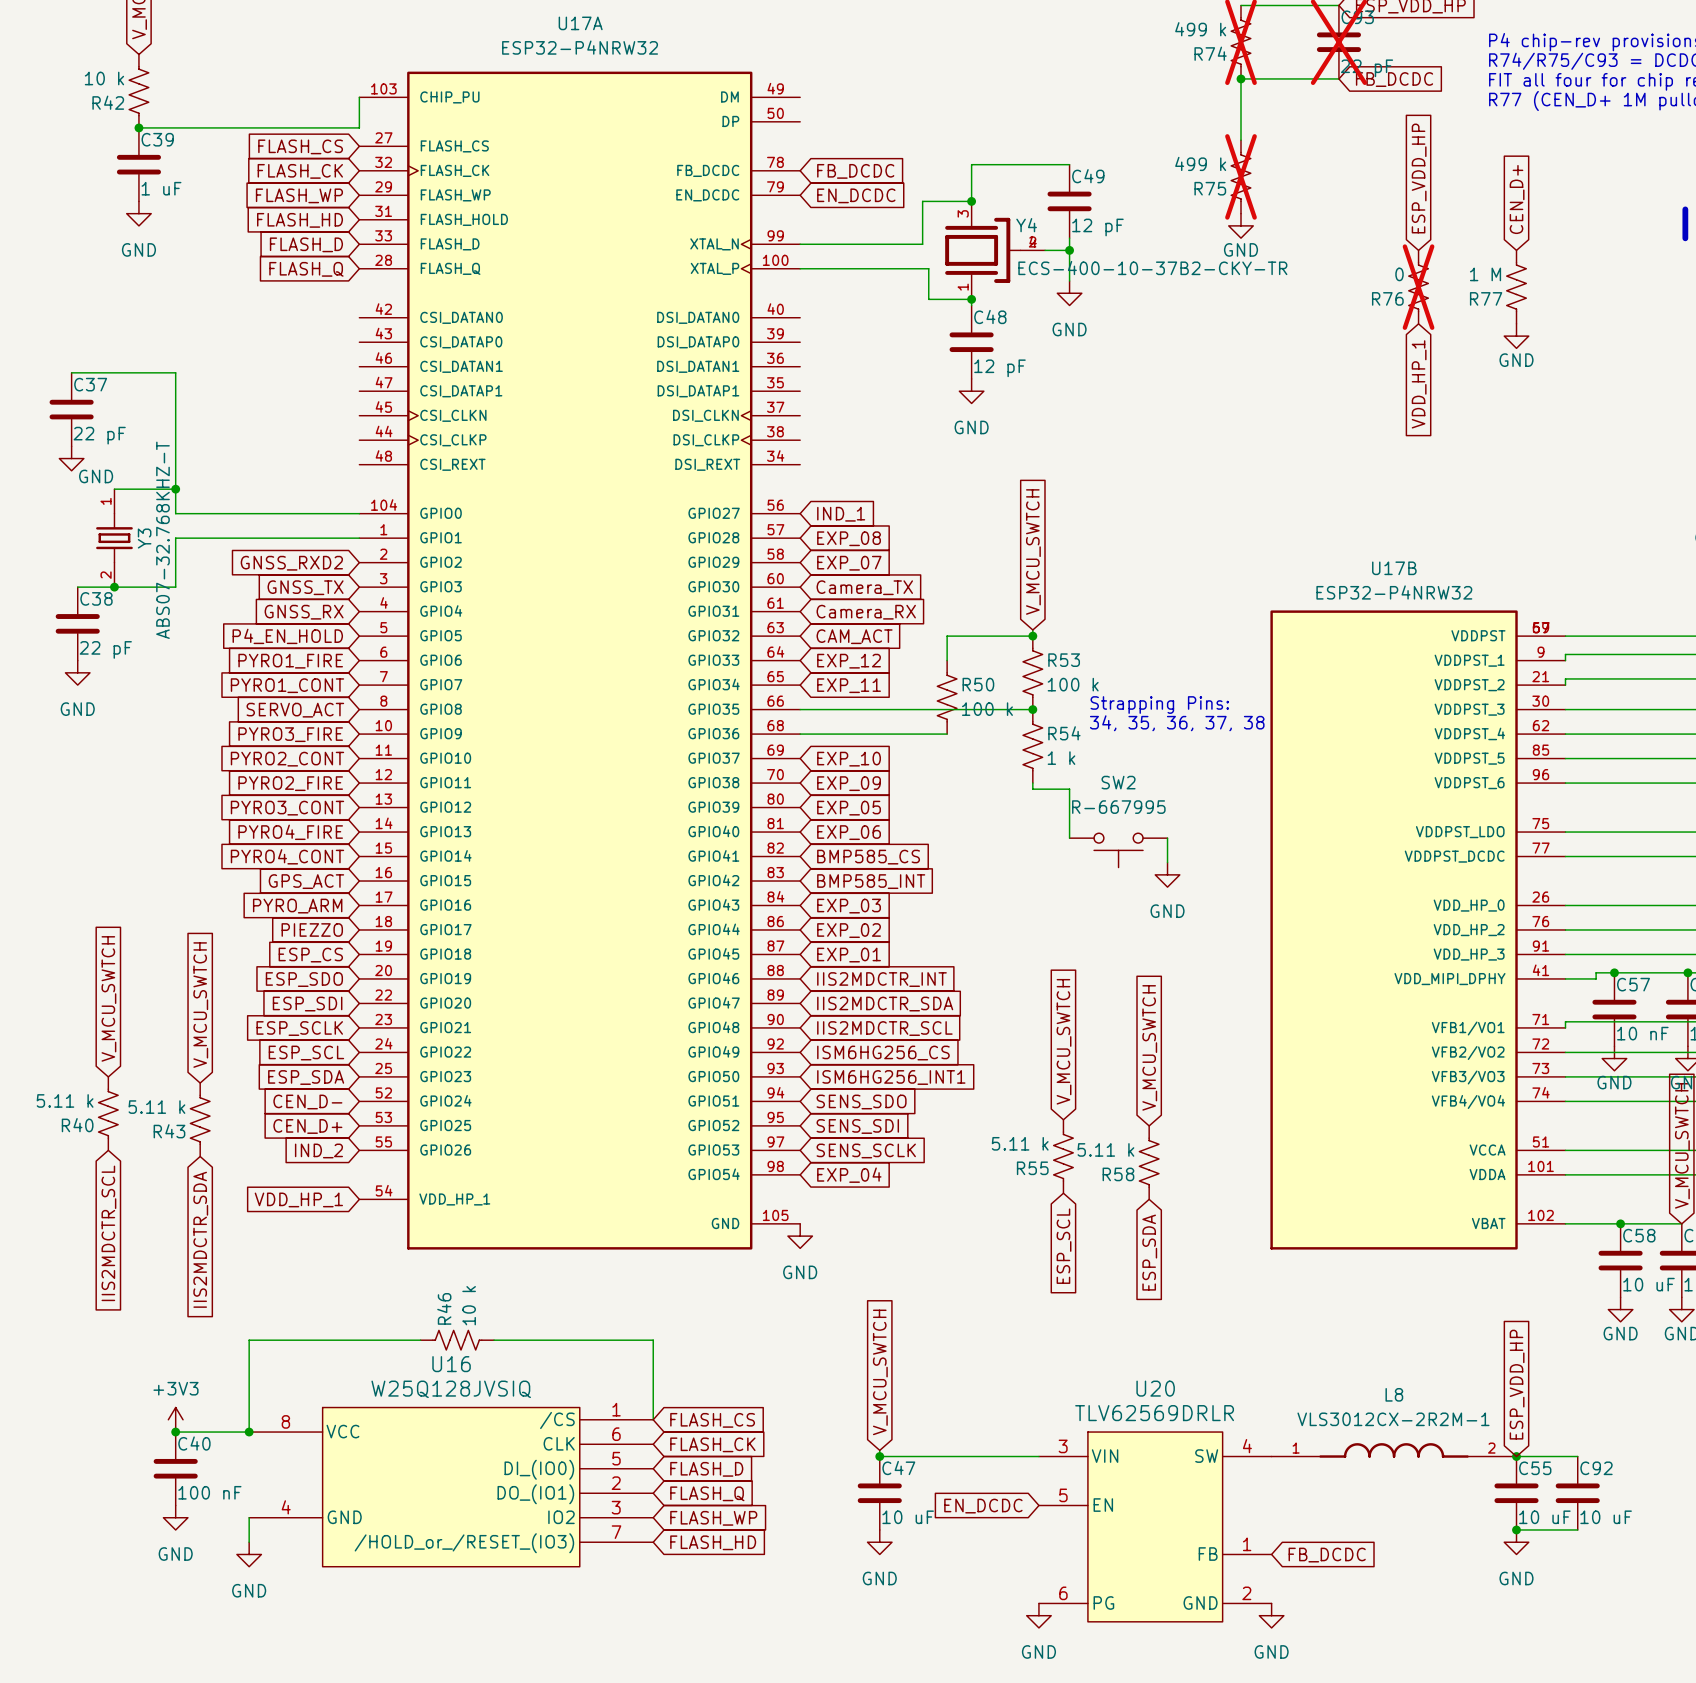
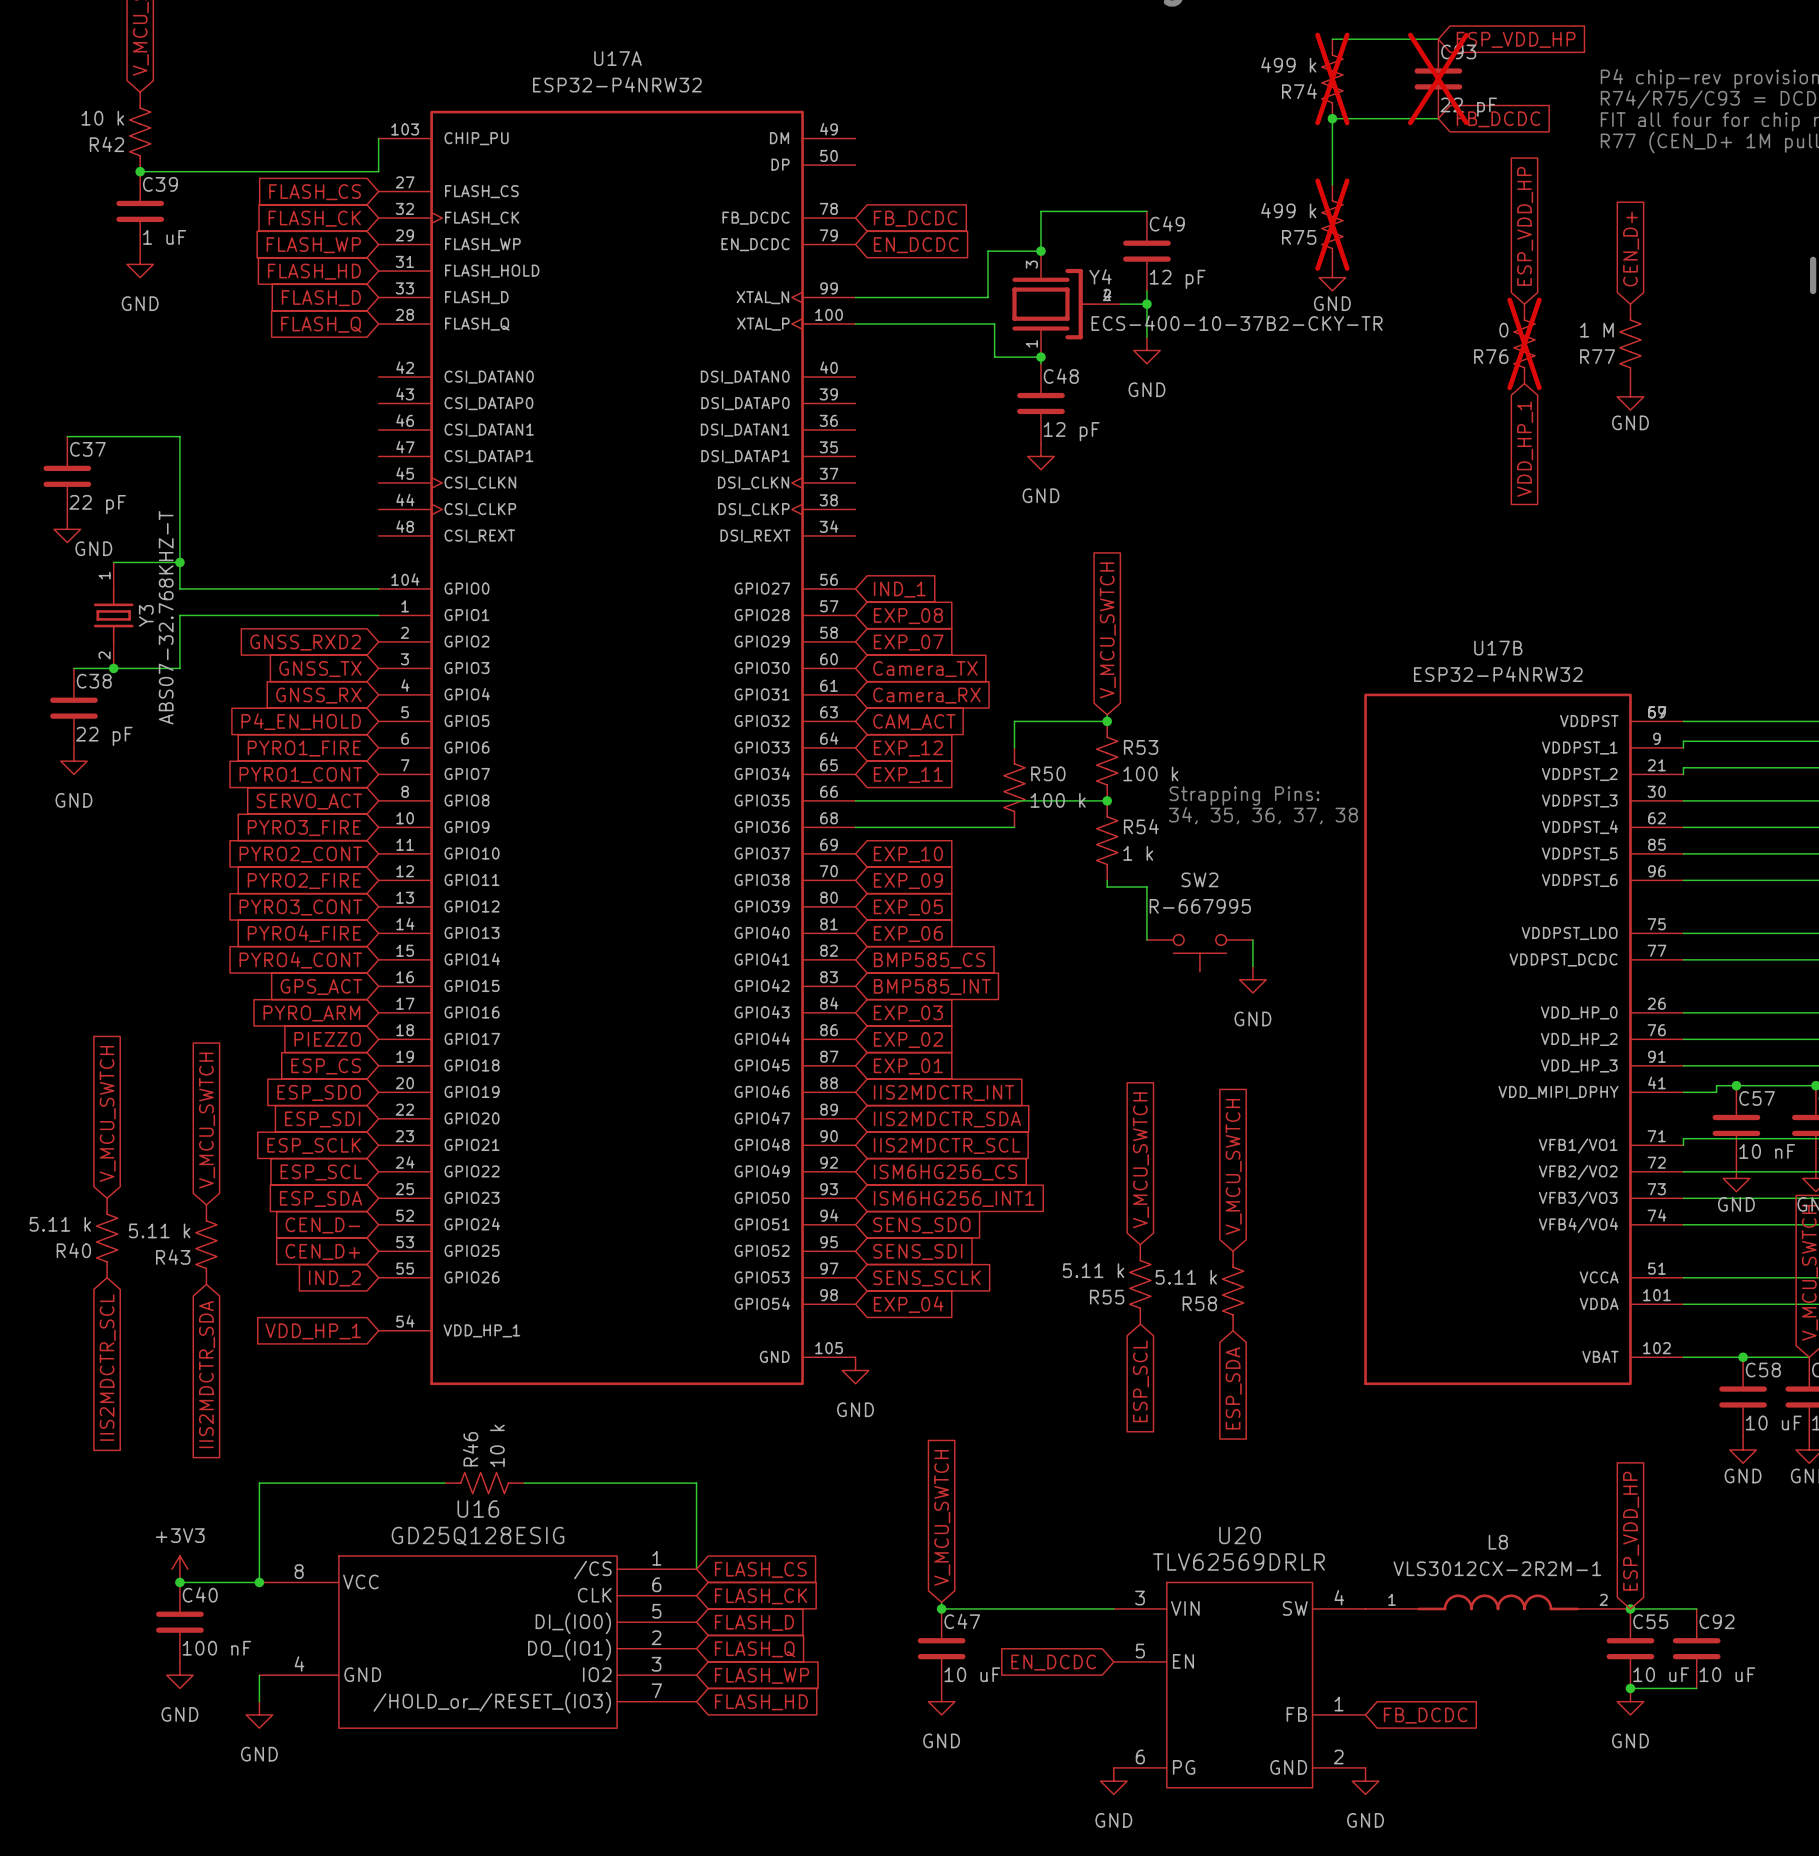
U16 value: W25Q128JVSIQ (451, 1389) -> GD25Q128ESIG (477, 1536)

